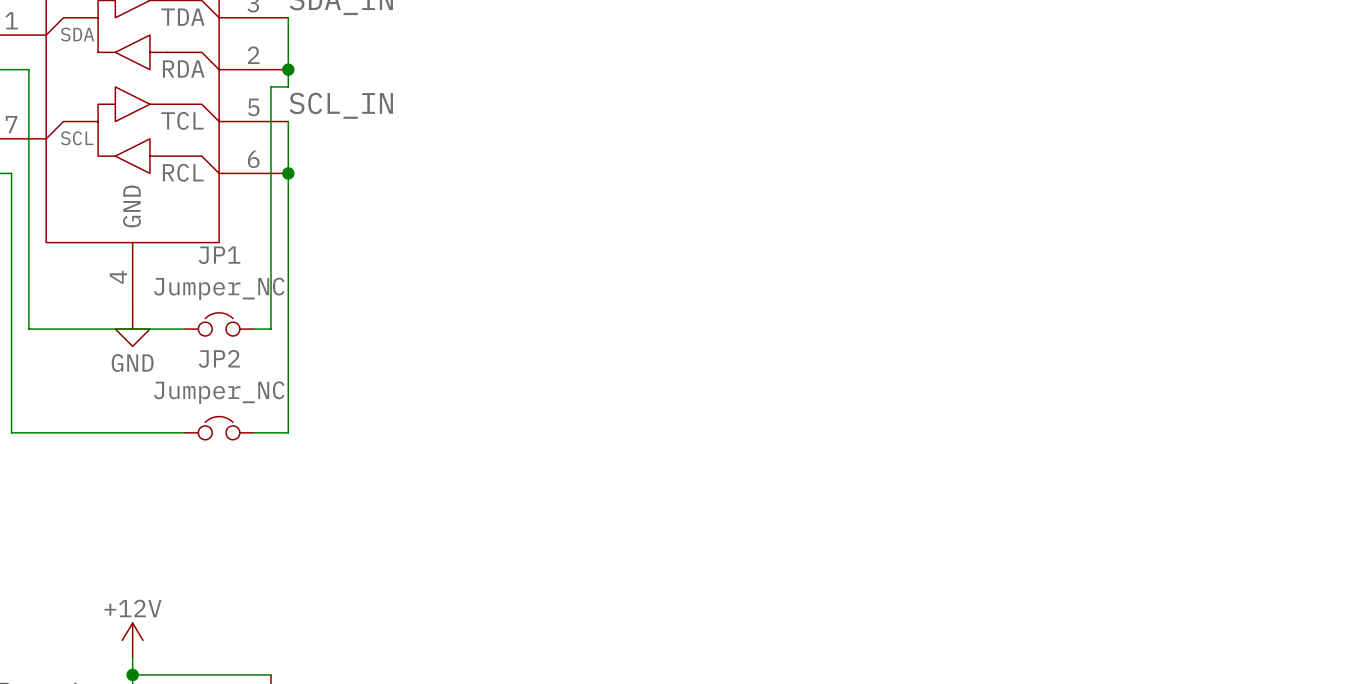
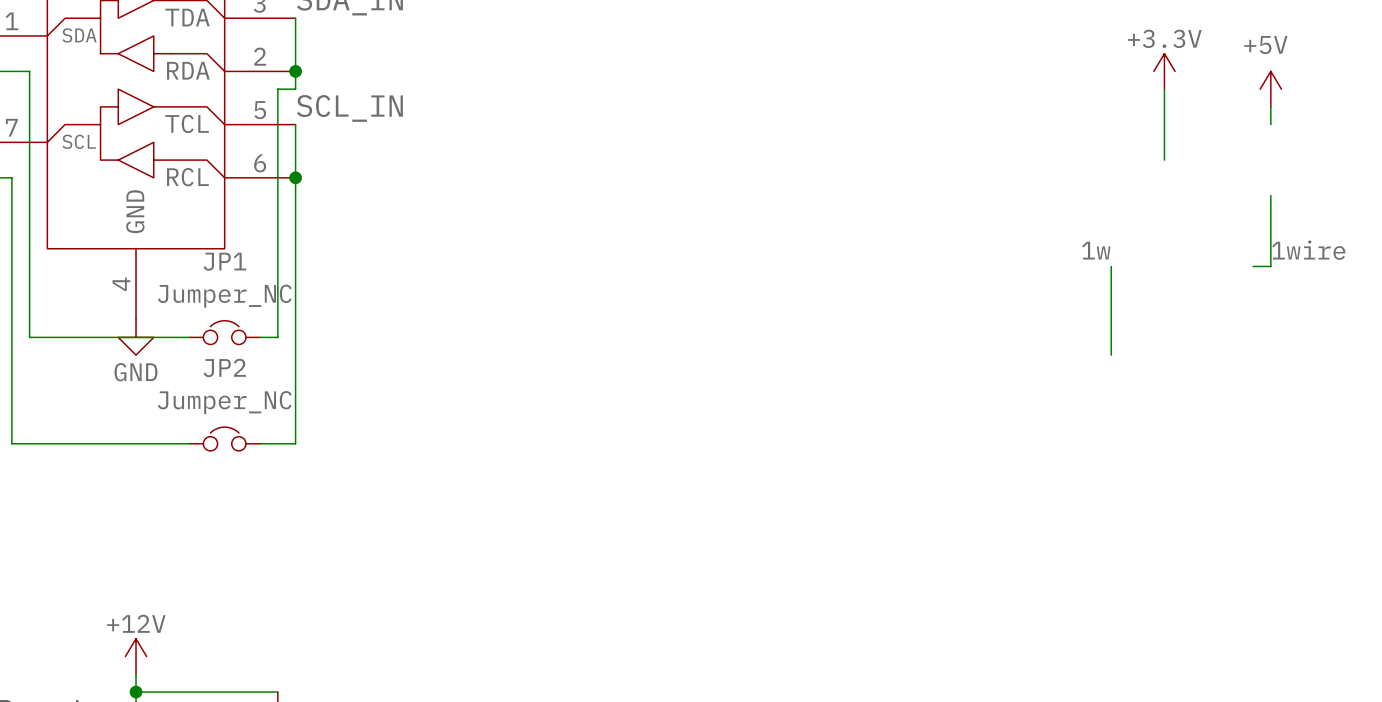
power symbol: none -> +3.3V (1164, 71)
wire: none -> (1164, 89) (1164, 160)
power symbol: none -> +5V (1270, 89)
wire: none -> (1270, 106) (1270, 124)
wire: none -> (1270, 195) (1270, 266) (1253, 266)
label: none -> 1wire (1308, 250)
label: none -> 1w (1096, 250)
wire: none -> (1111, 266) (1111, 355)

